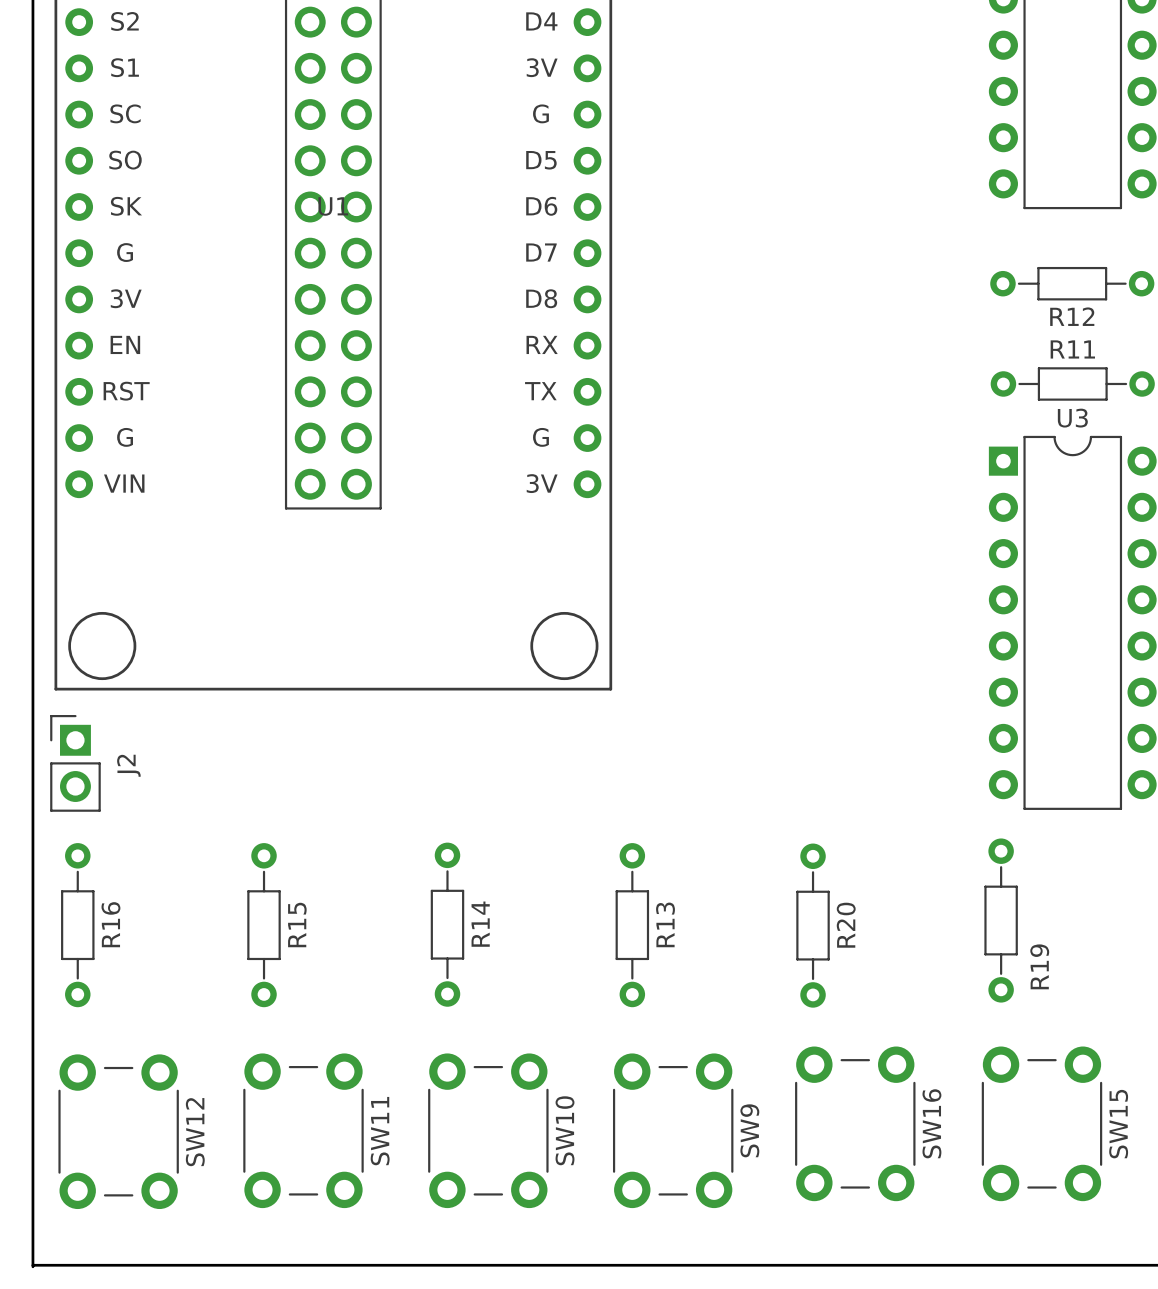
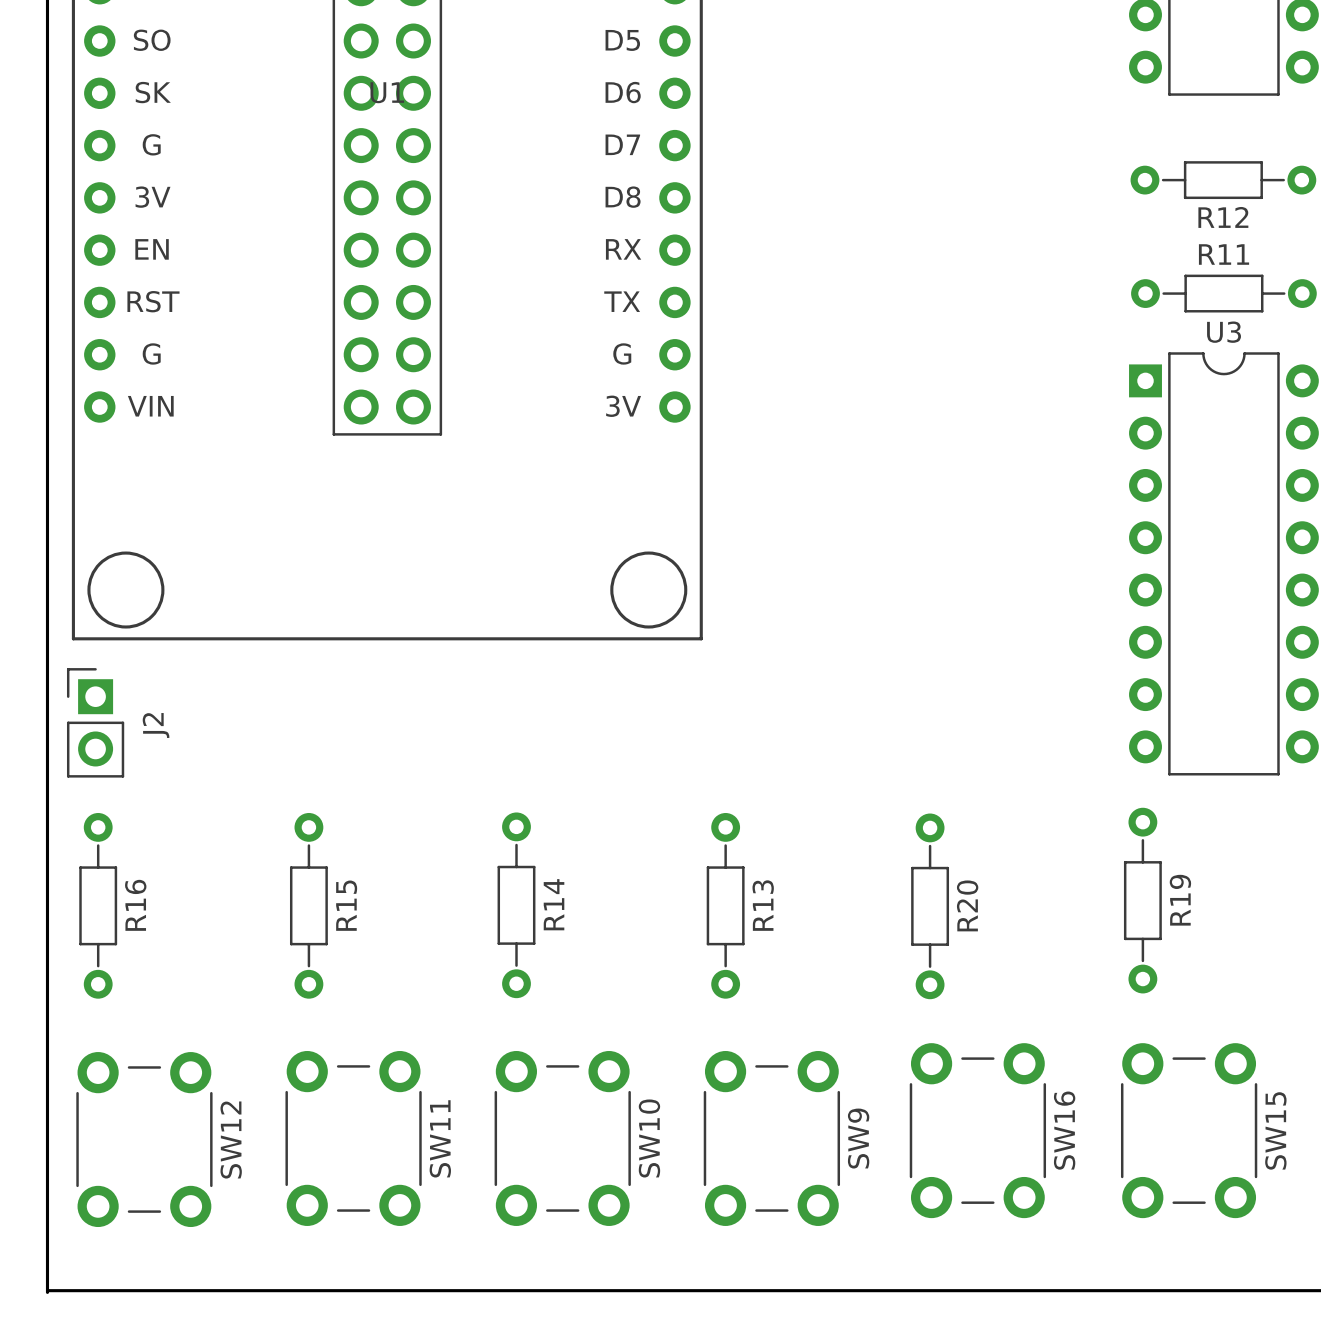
R19 name position: R19 (1039, 966) -> R19 (1180, 900)

